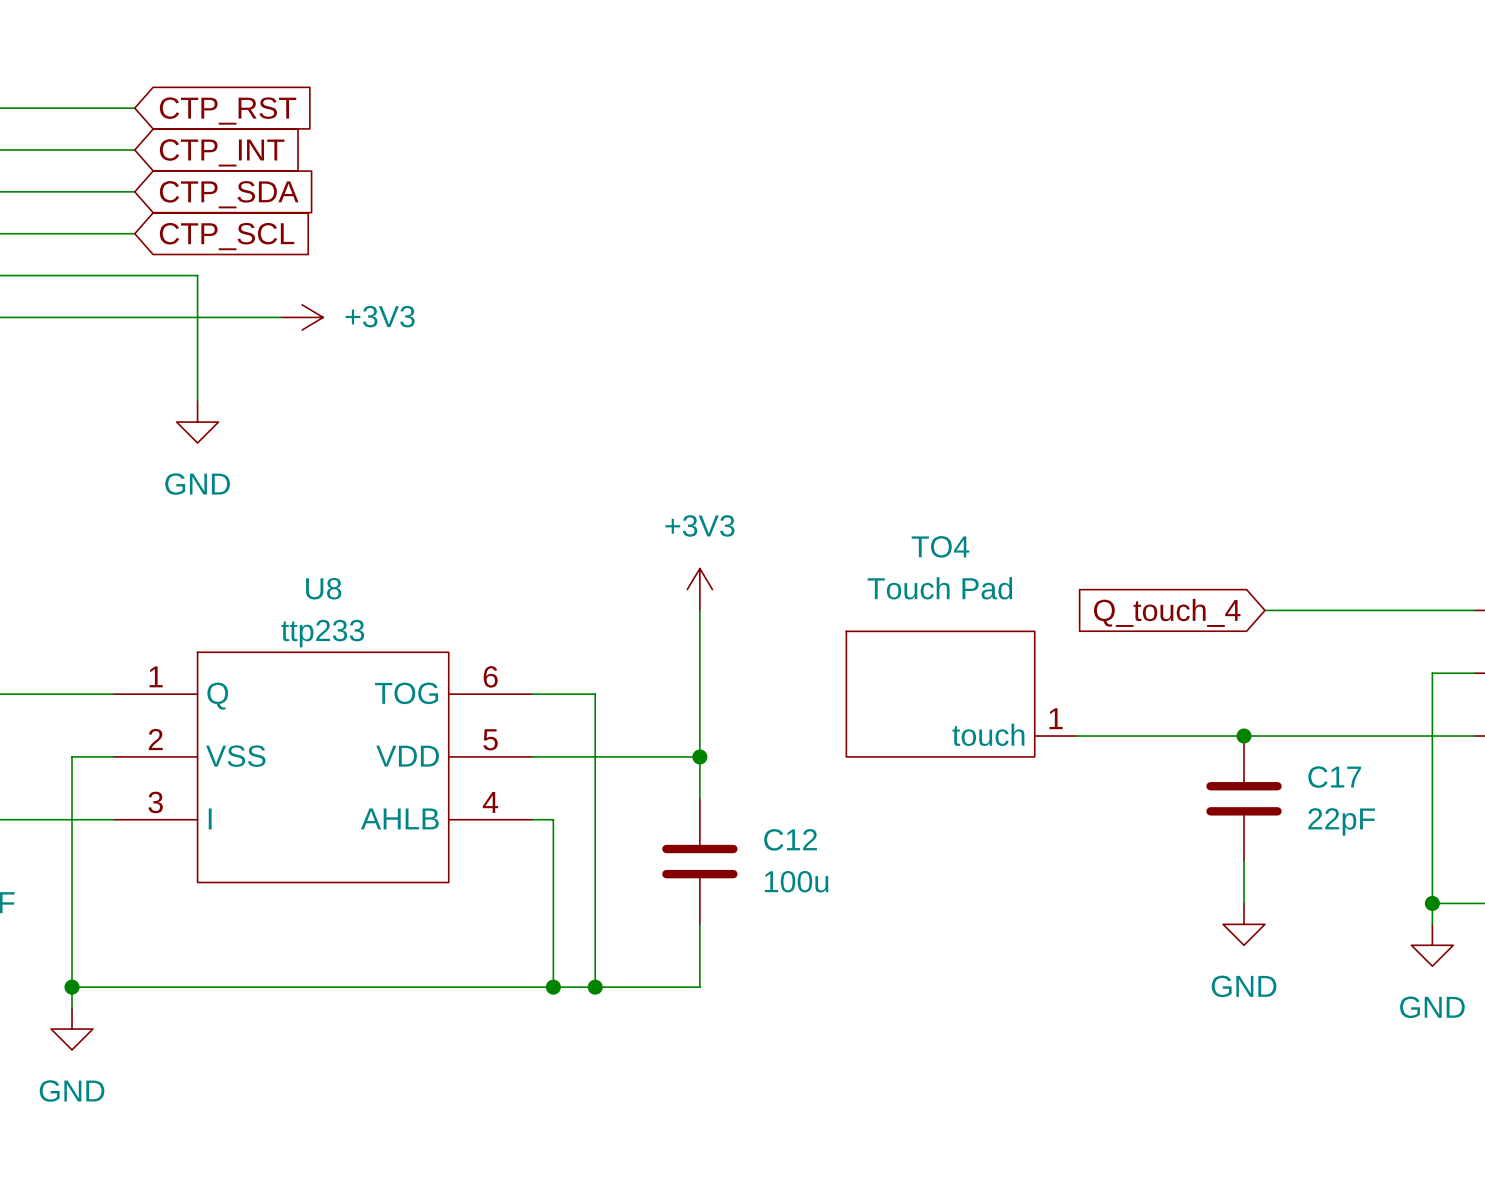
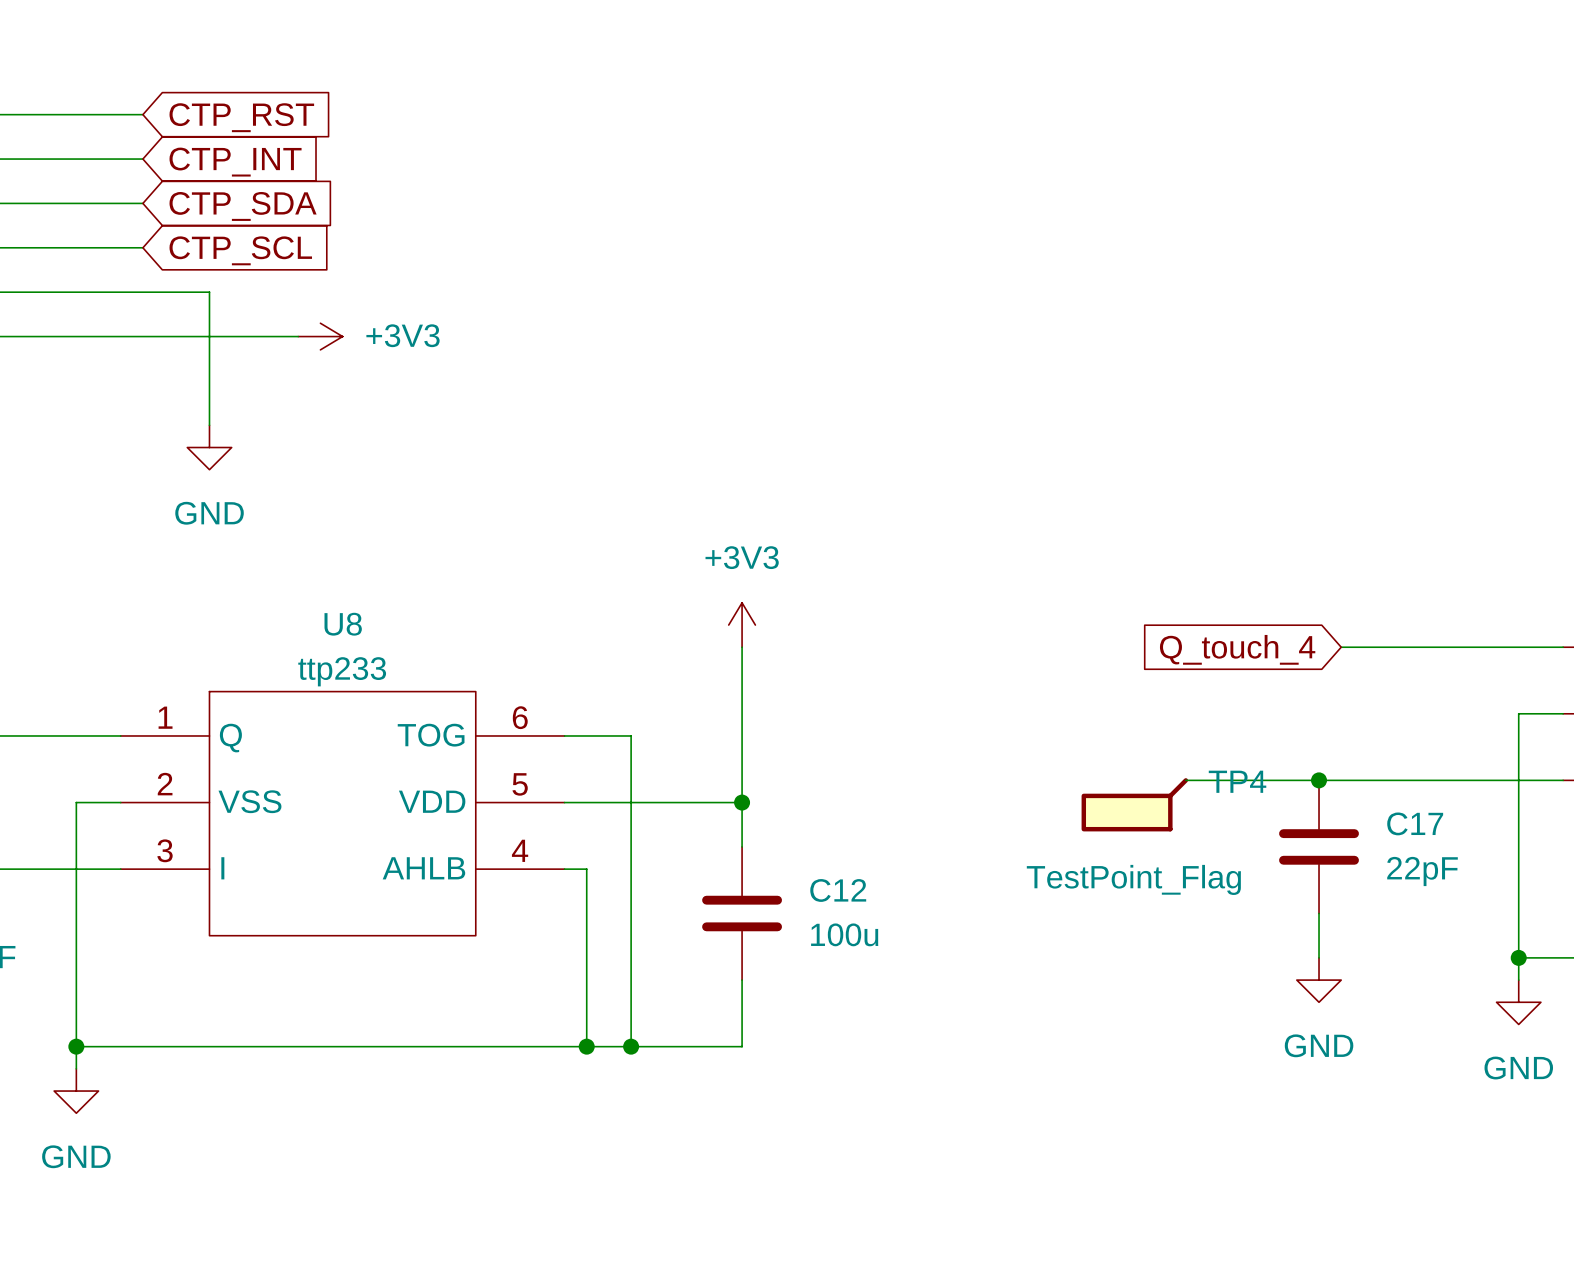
TO4: Touch Pad (961, 694) -> none
wire: (1076, 736) (1118, 736) -> none
TP4: none -> TestPoint_Flag (1134, 804)

